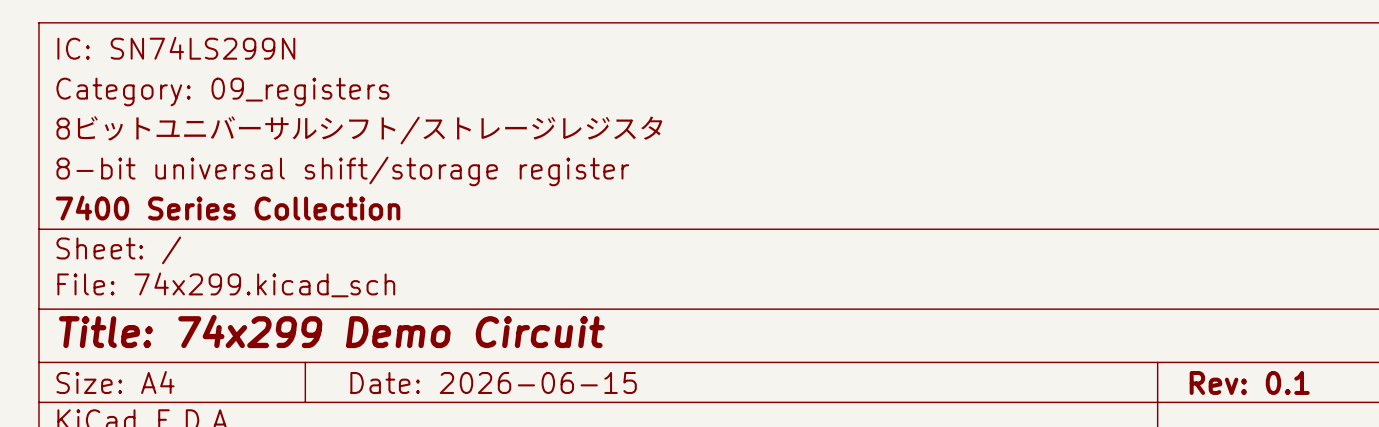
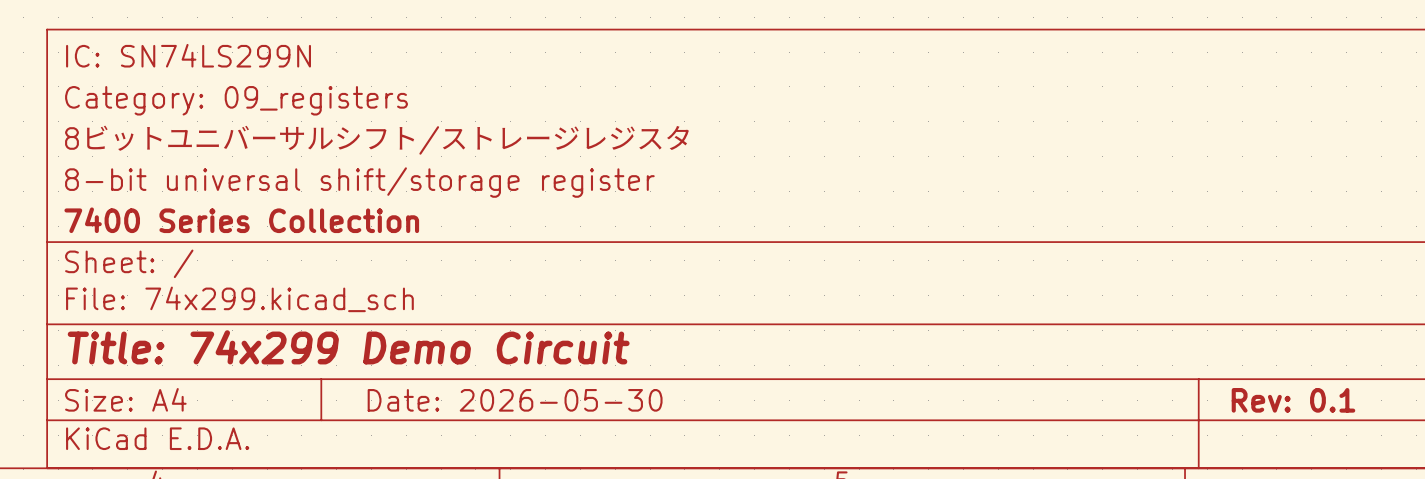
title block: Date: 2026-06-15 (493, 382) -> Date: 2026-05-30 (515, 400)

